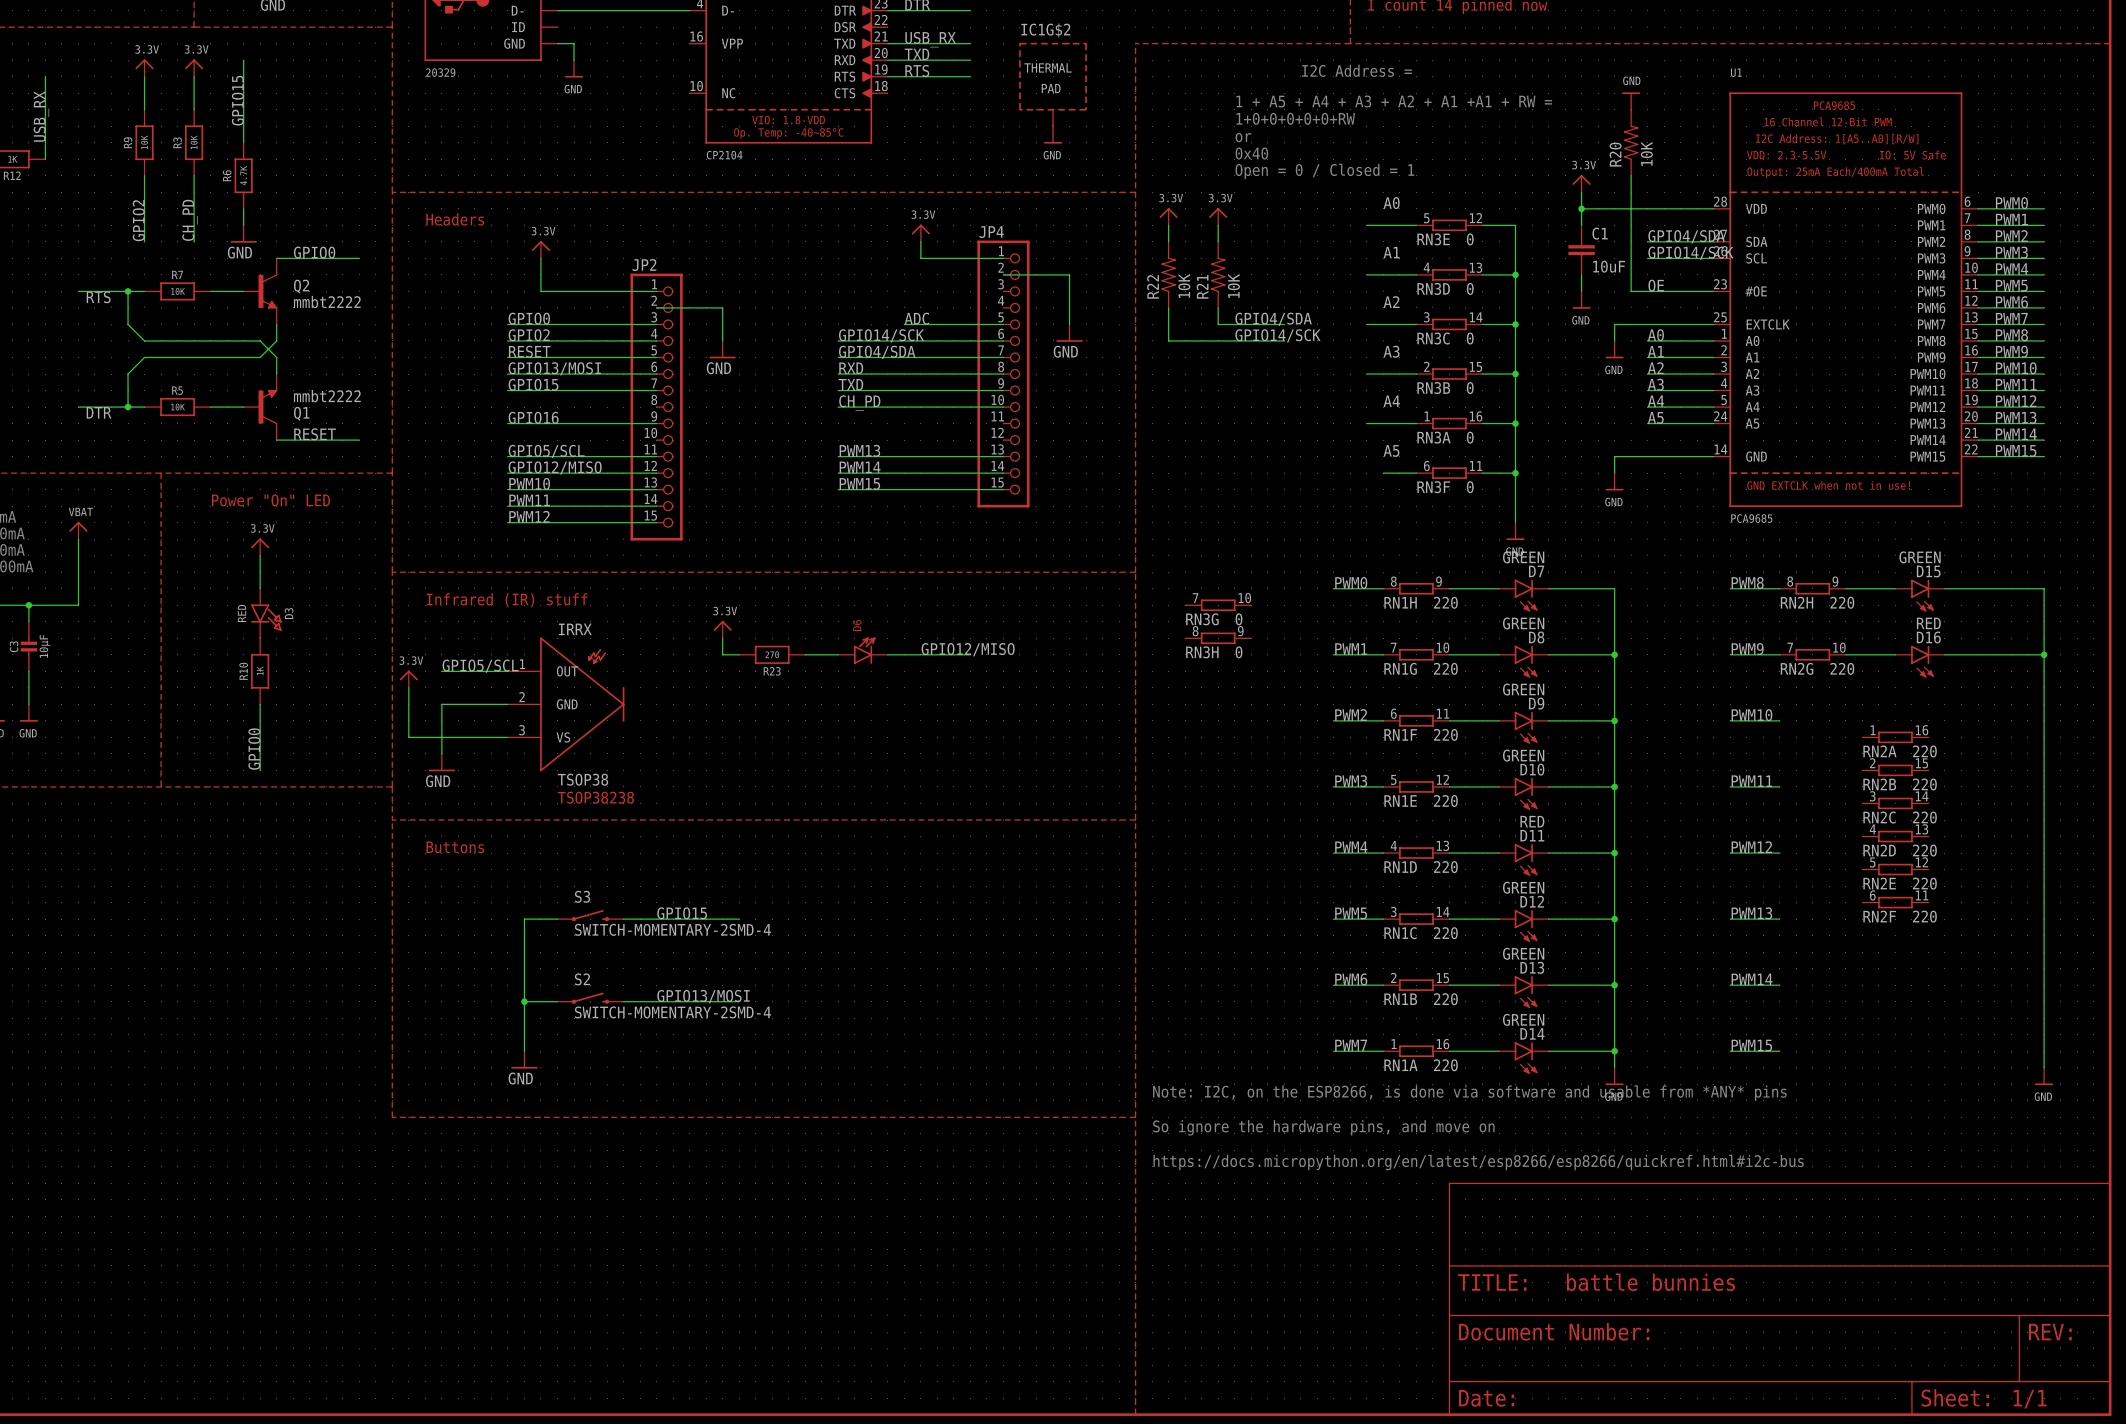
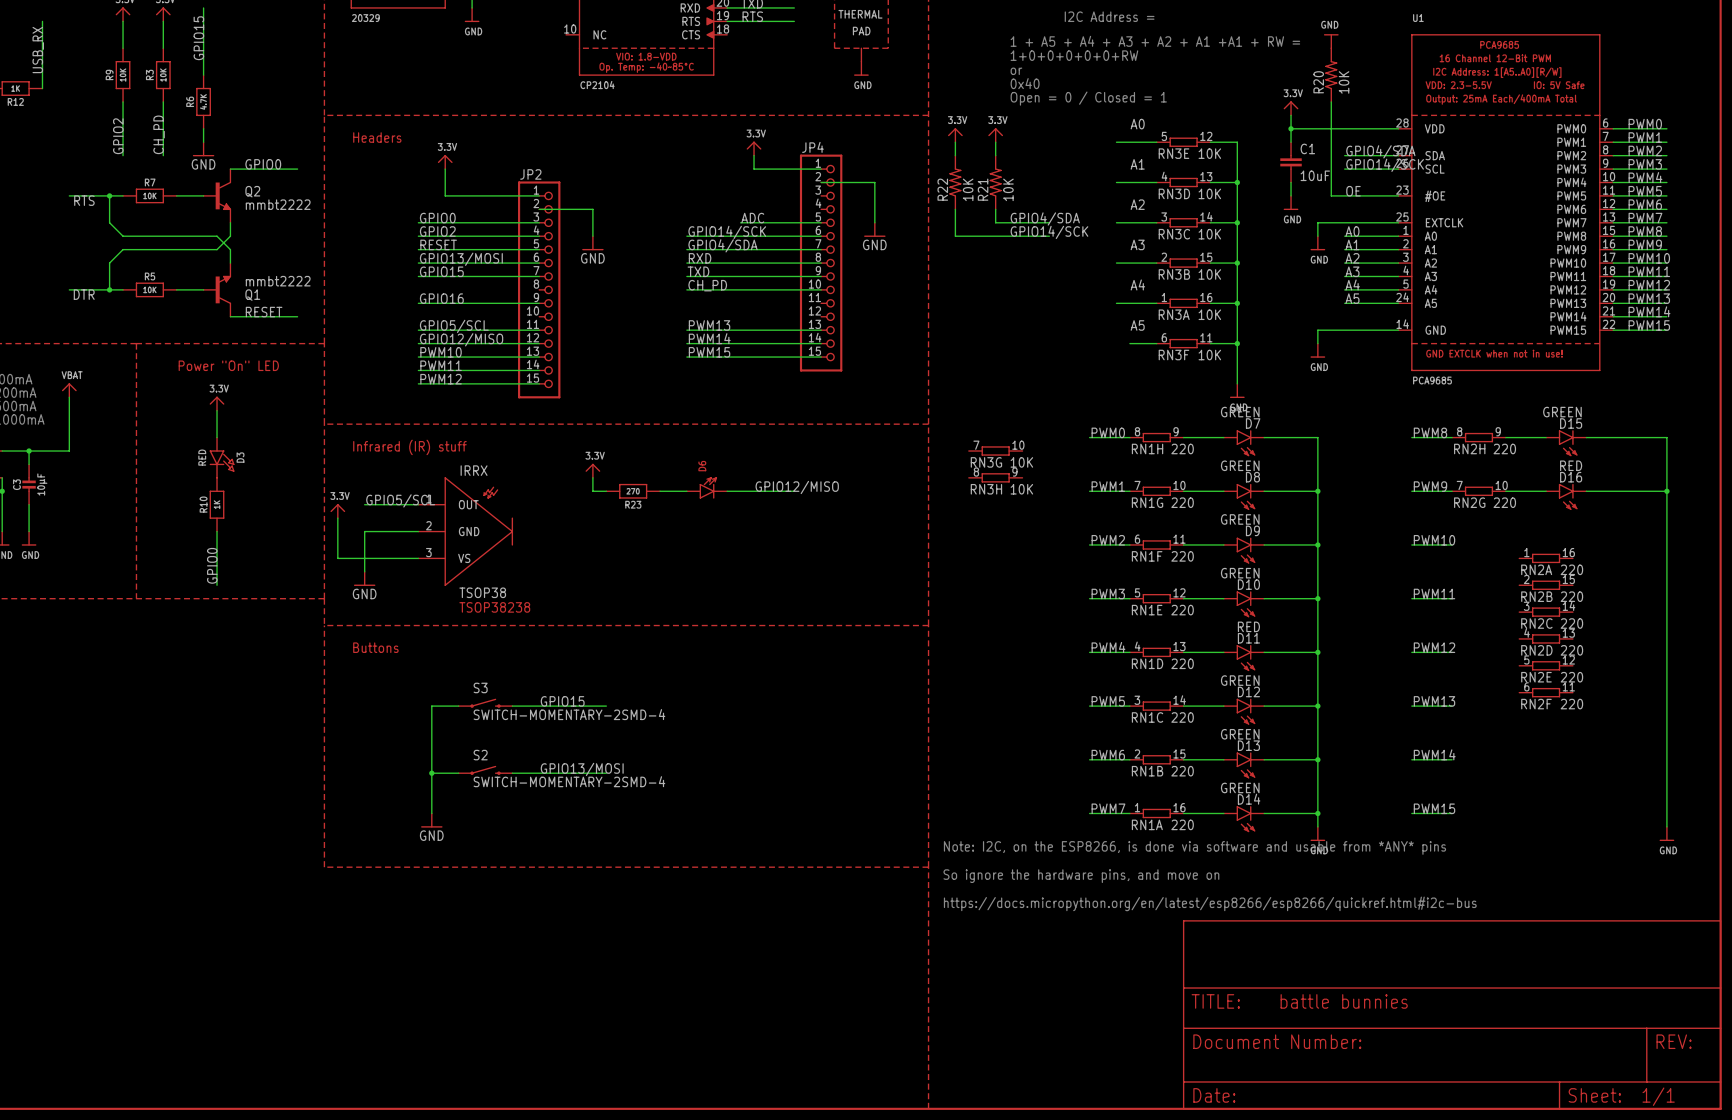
RN3E value: 0 (1470, 239) -> 10K (1209, 153)
RN3D value: 0 (1470, 288) -> 10K (1209, 193)
RN3C value: 0 (1470, 338) -> 10K (1209, 234)
RN3B value: 0 (1470, 388) -> 10K (1209, 274)
RN3A value: 0 (1470, 437) -> 10K (1209, 314)
RN3F value: 0 (1470, 487) -> 10K (1209, 355)
RN3G value: 0 (1239, 619) -> 10K (1021, 462)
RN3H value: 0 (1239, 652) -> 10K (1021, 489)

